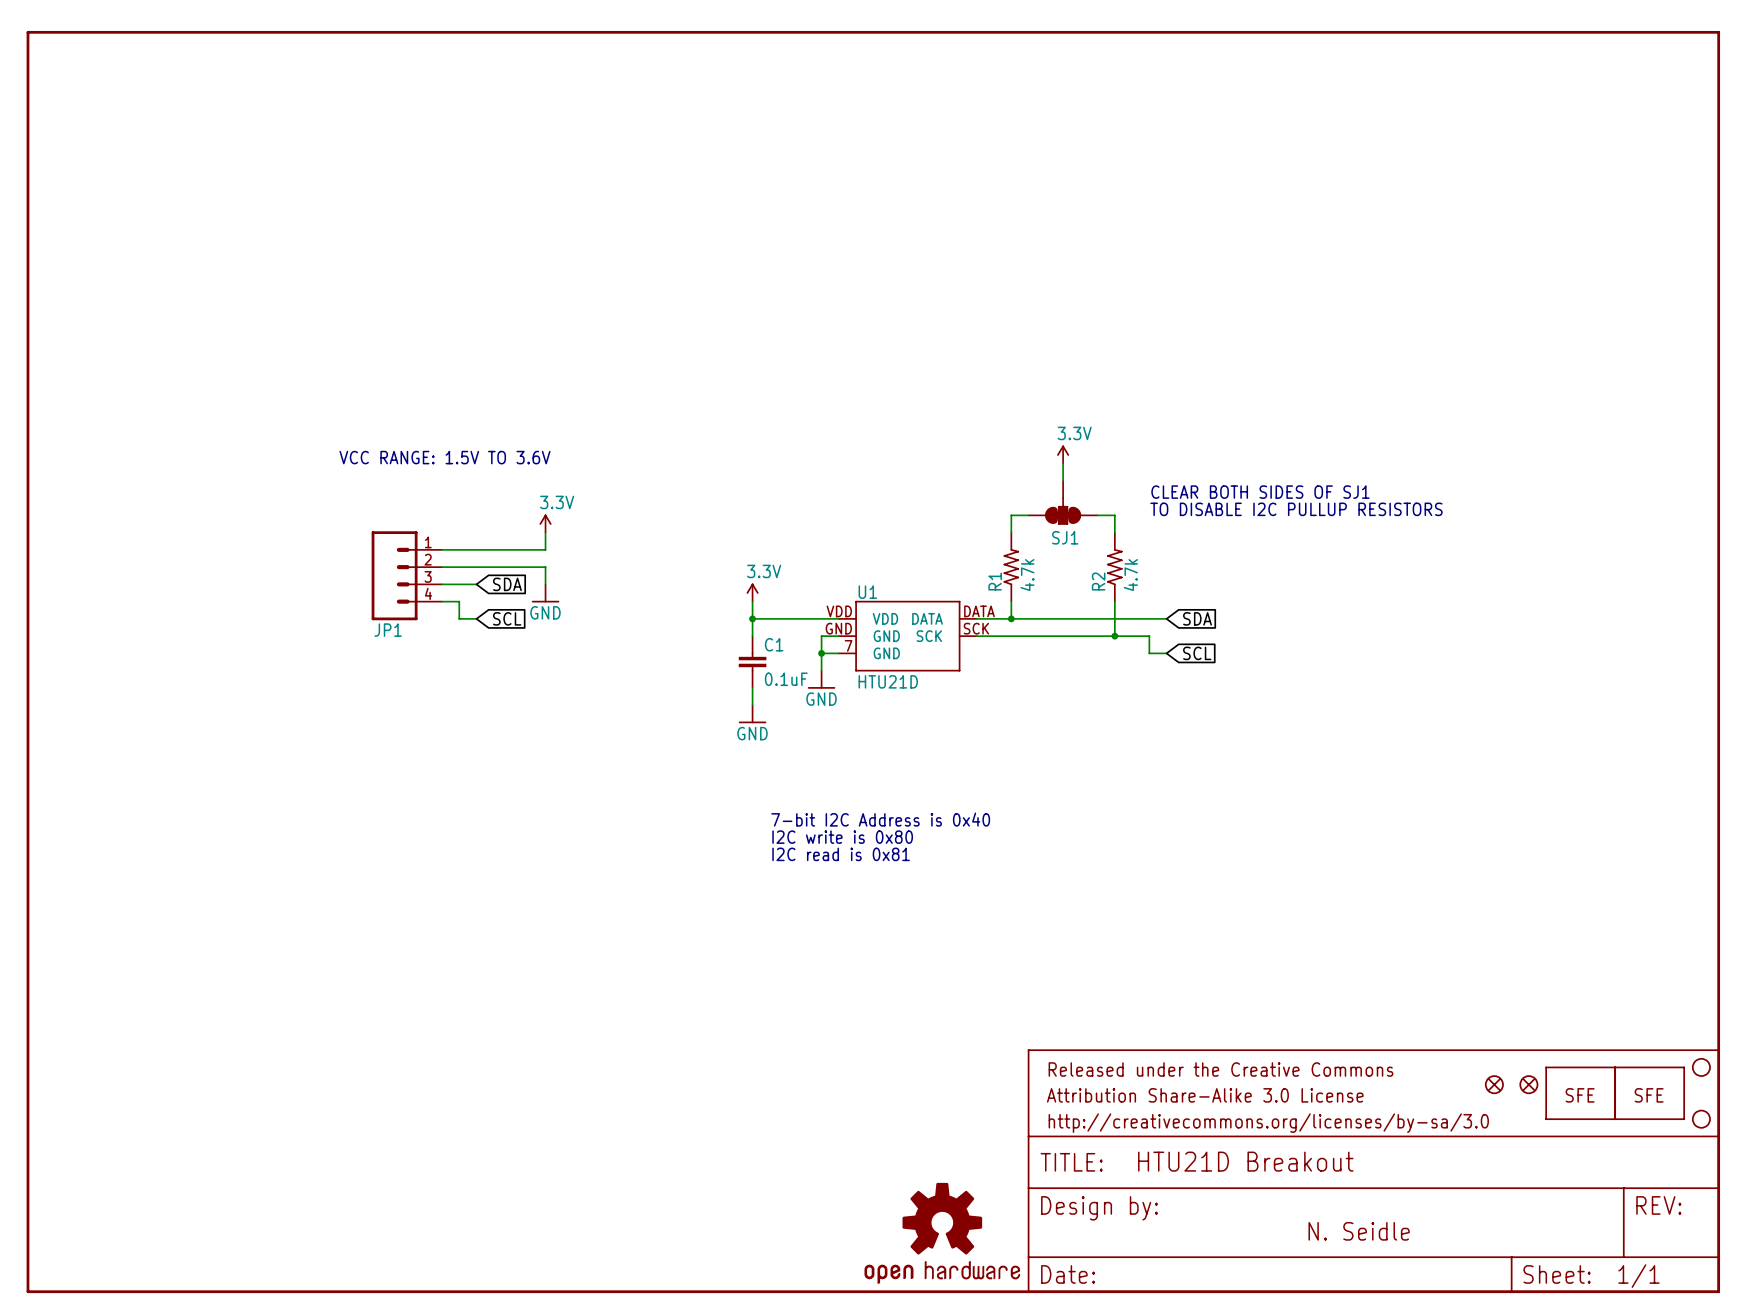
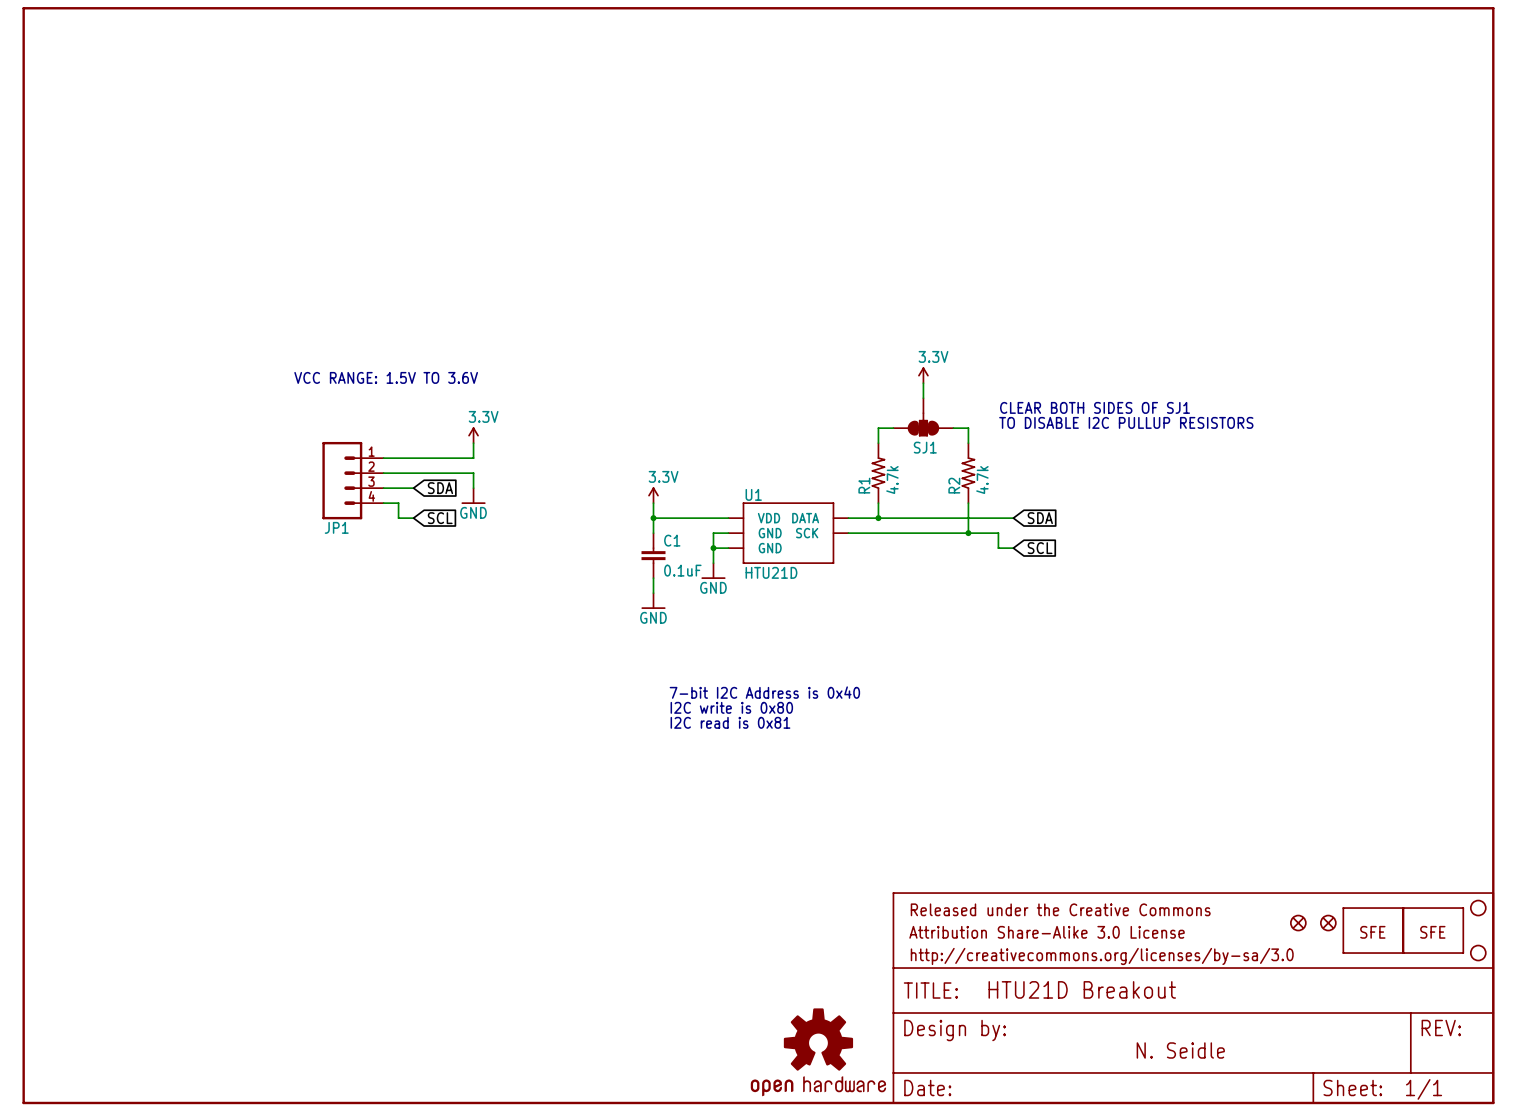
U1 pin number: VDD (839, 611) -> none
U1 pin number: DATA (979, 611) -> none
U1 pin number: GND (838, 628) -> none
U1 pin number: SCK (976, 628) -> none
U1 pin number: 7 (848, 645) -> none

